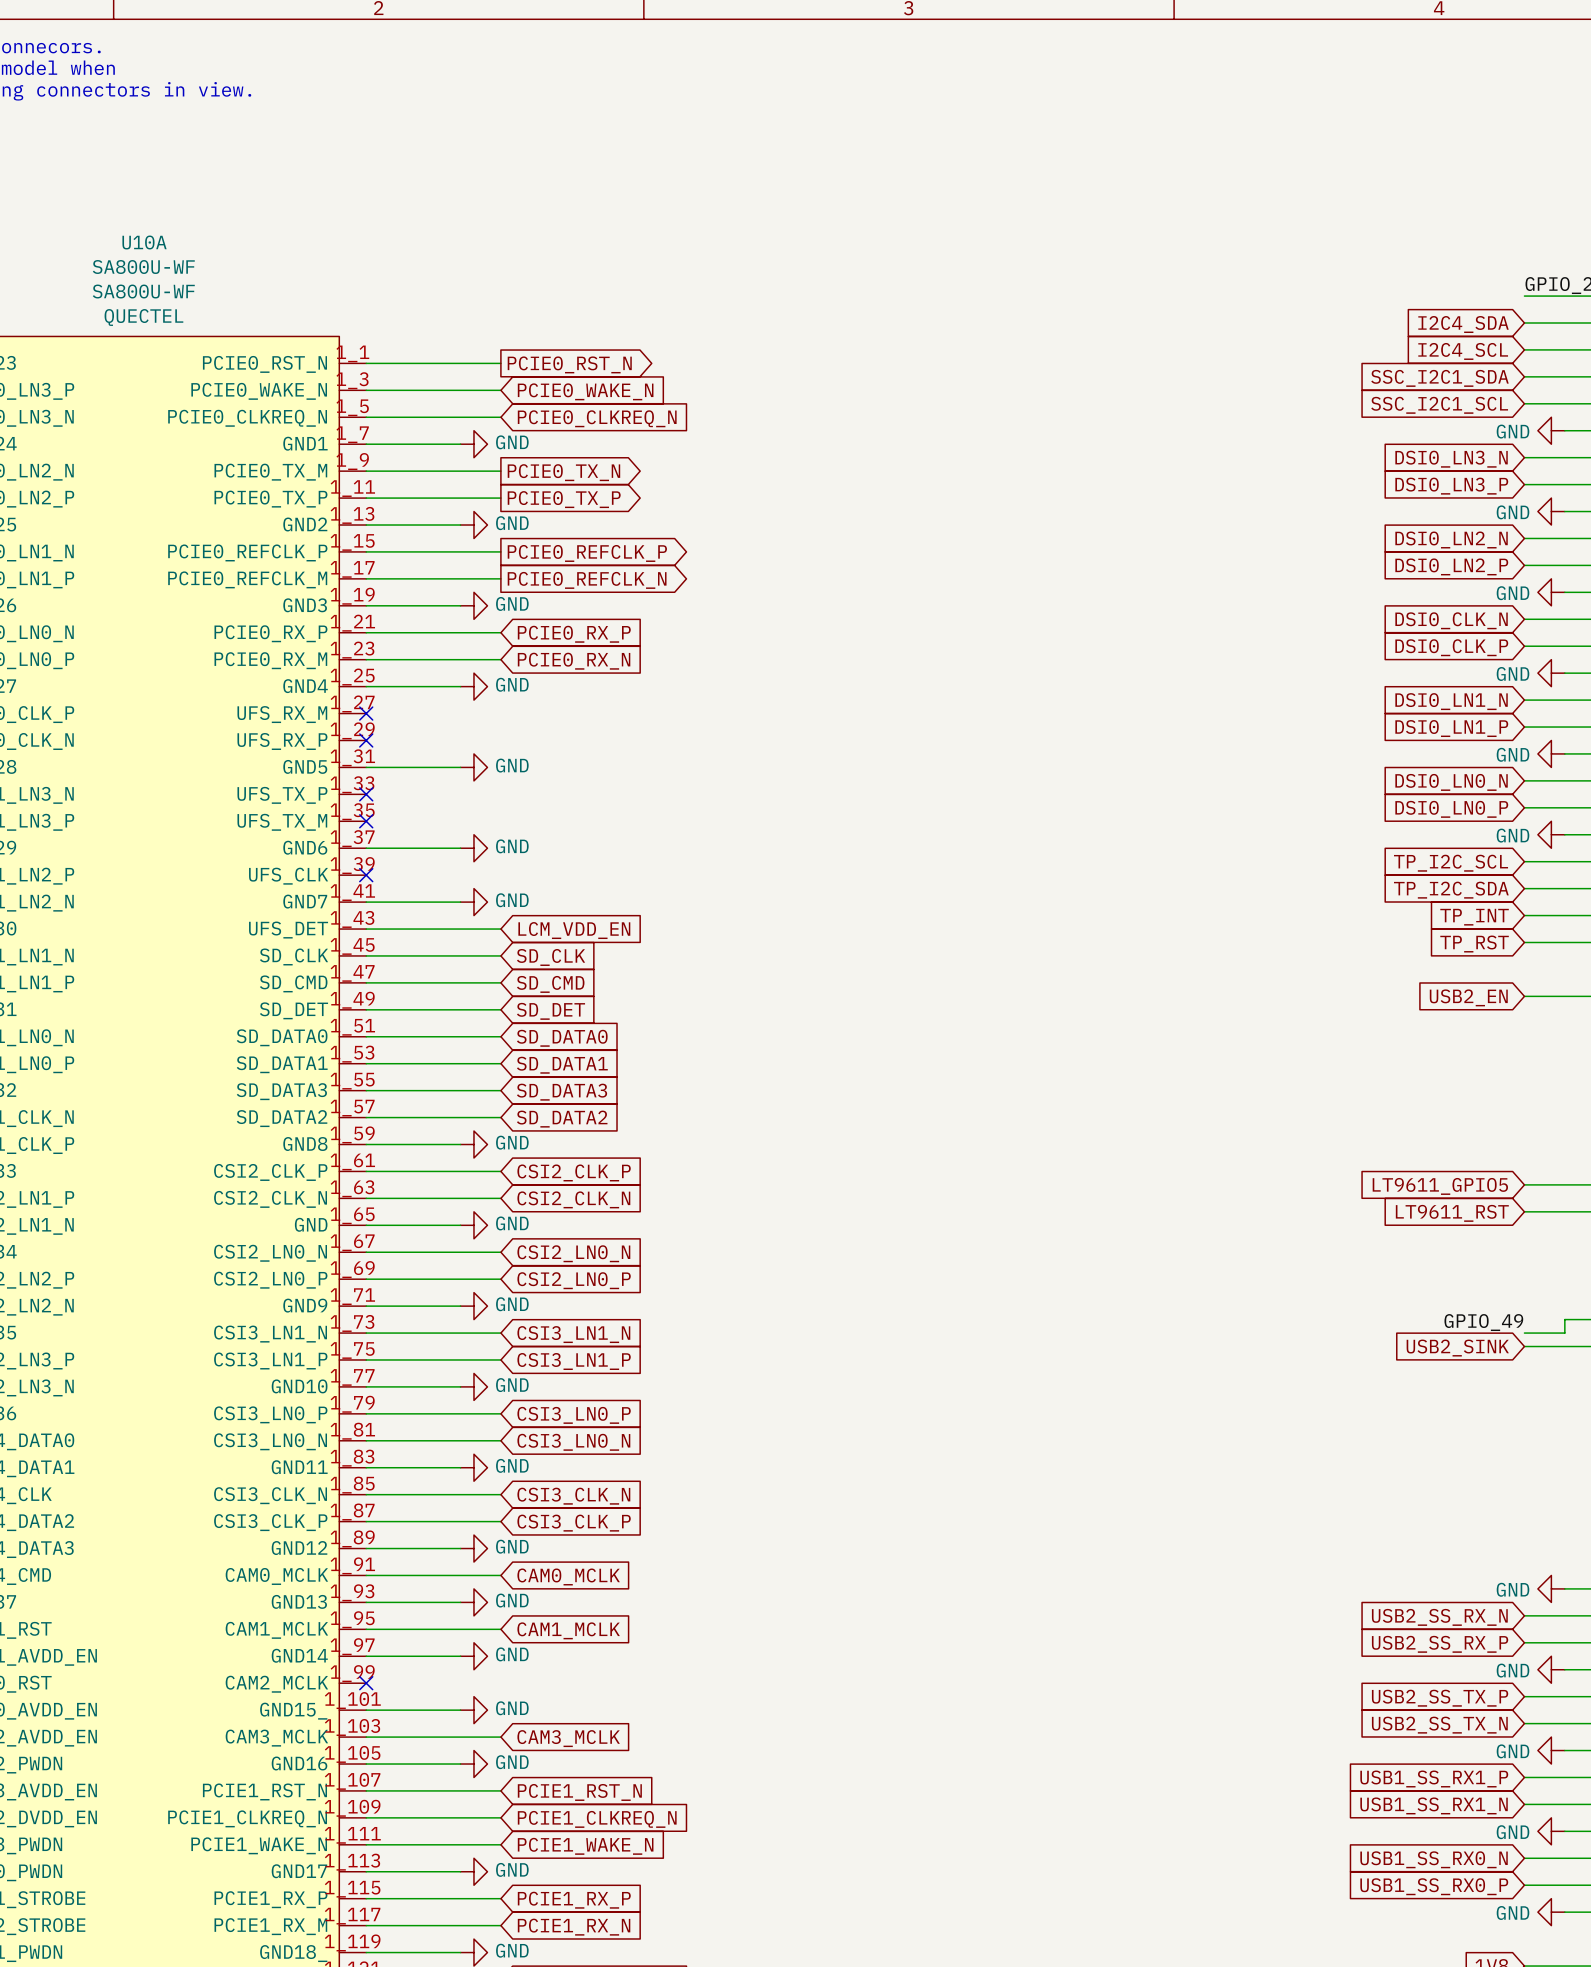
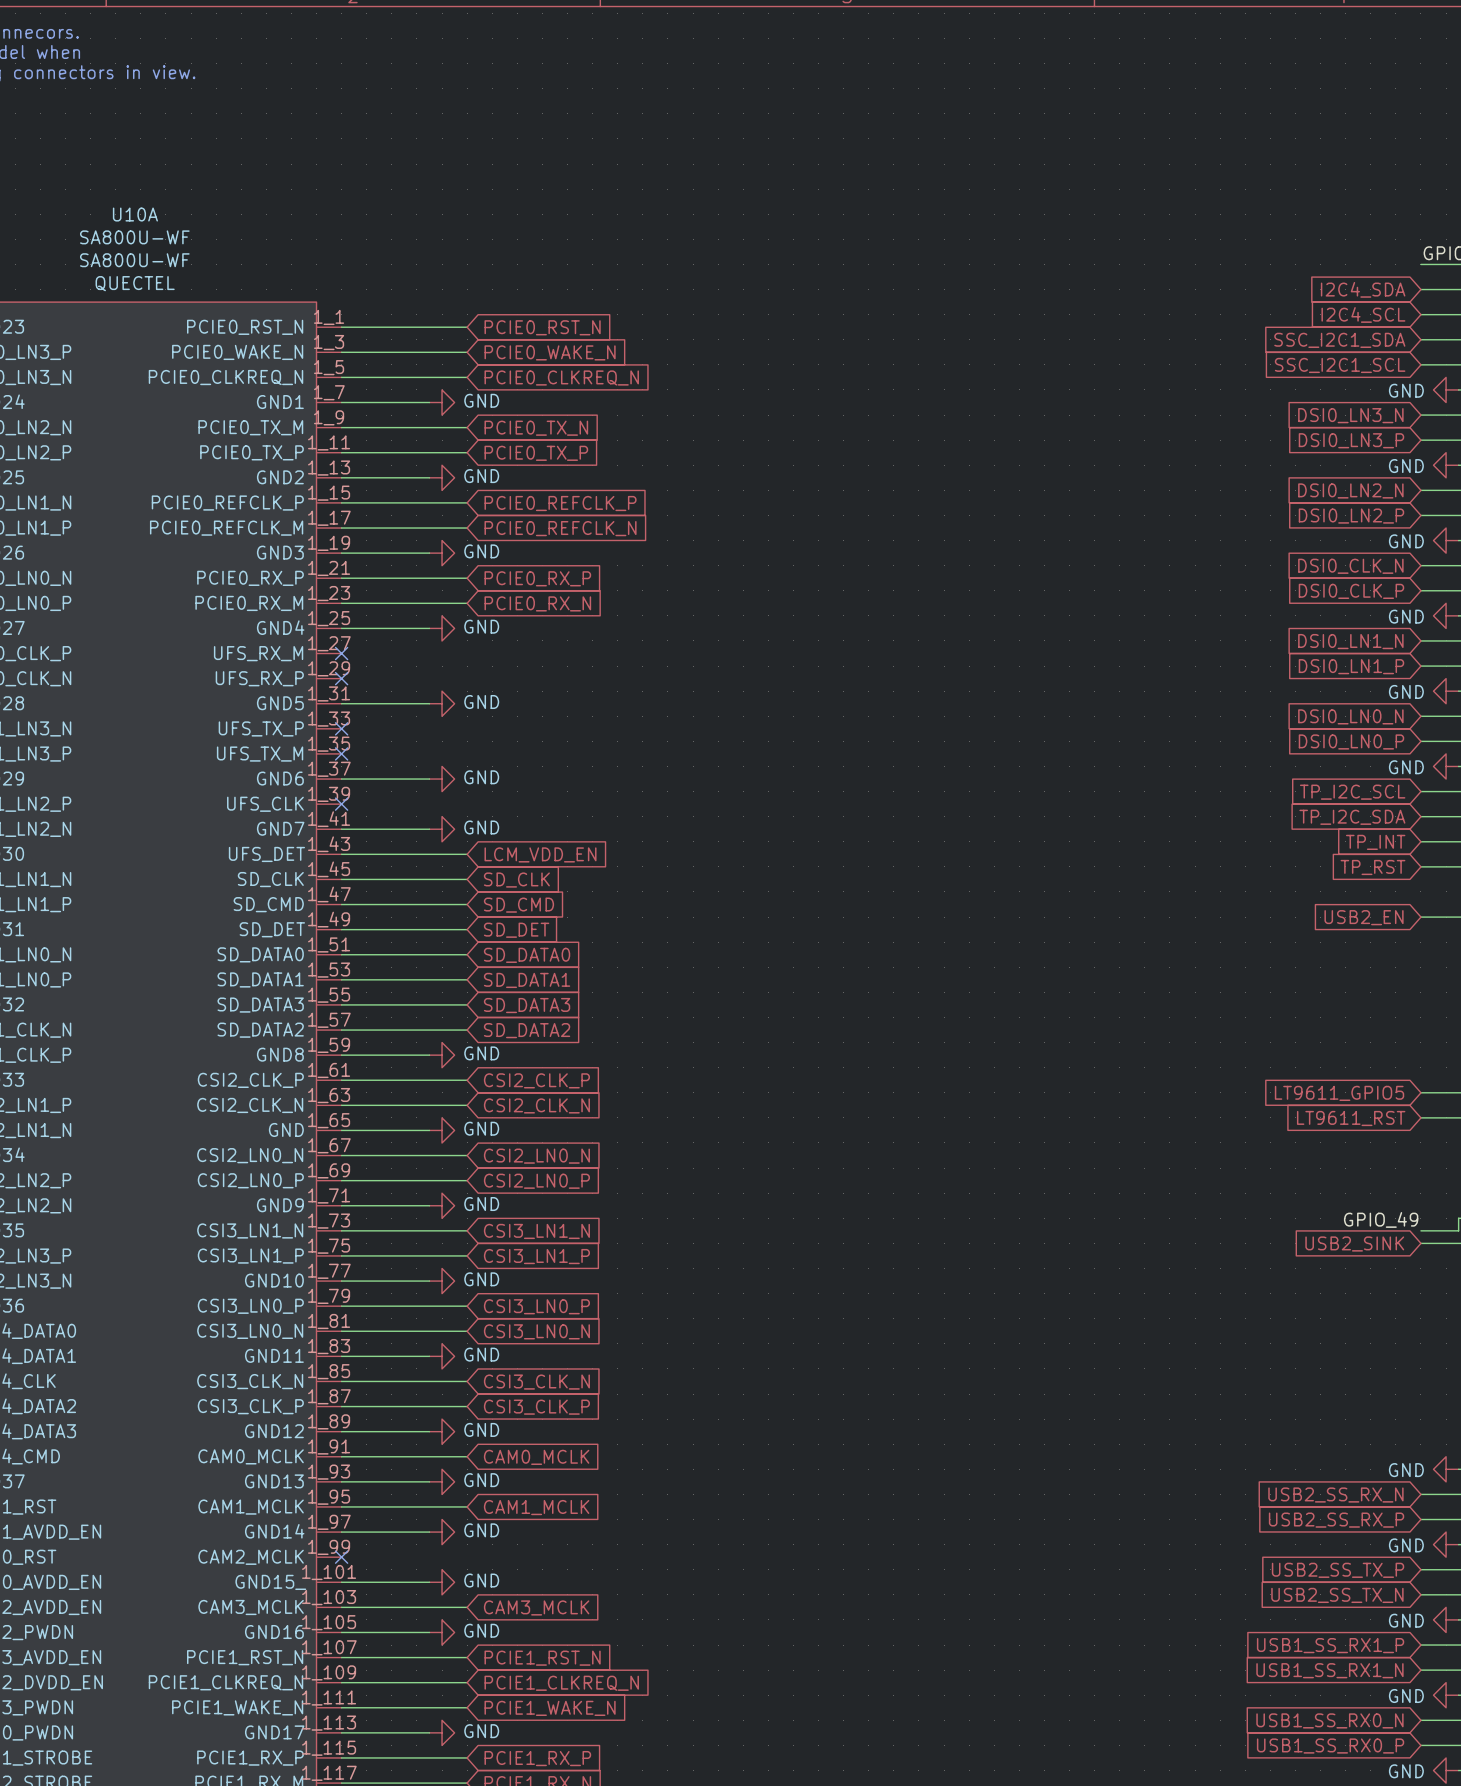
global label shape: output (569, 364) -> input (542, 327)
global label shape: output (563, 472) -> input (536, 428)
global label shape: output (564, 499) -> input (536, 453)
global label shape: output (587, 553) -> input (560, 503)
global label shape: output (587, 580) -> input (560, 528)

